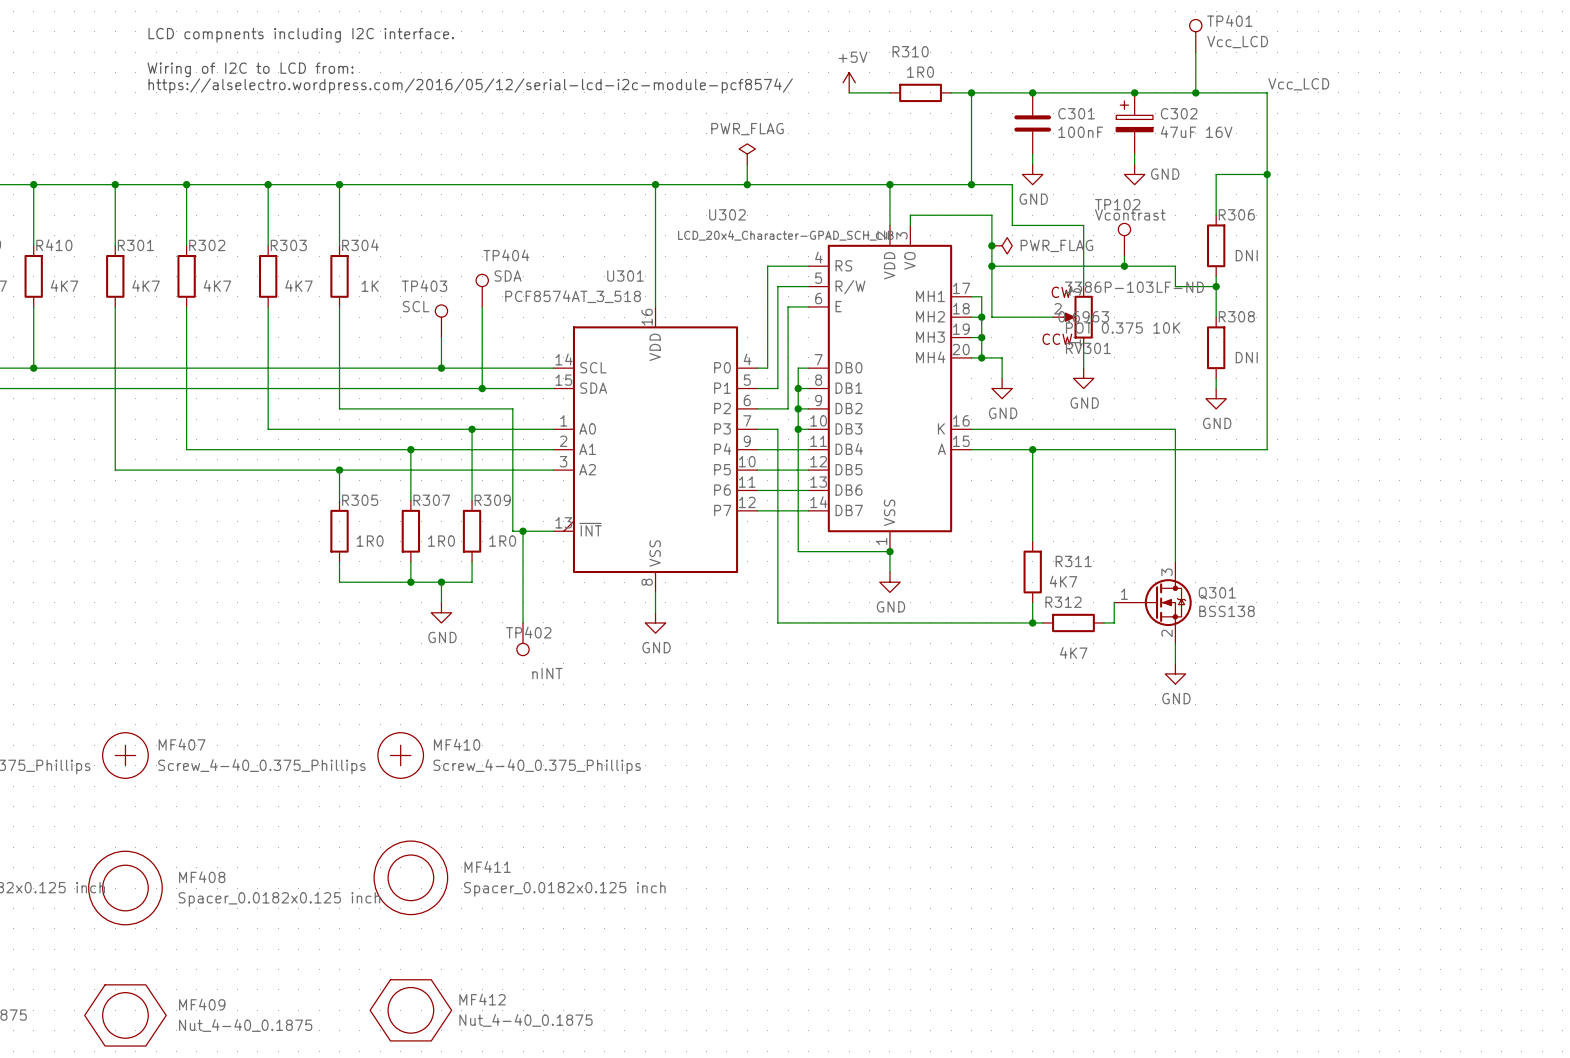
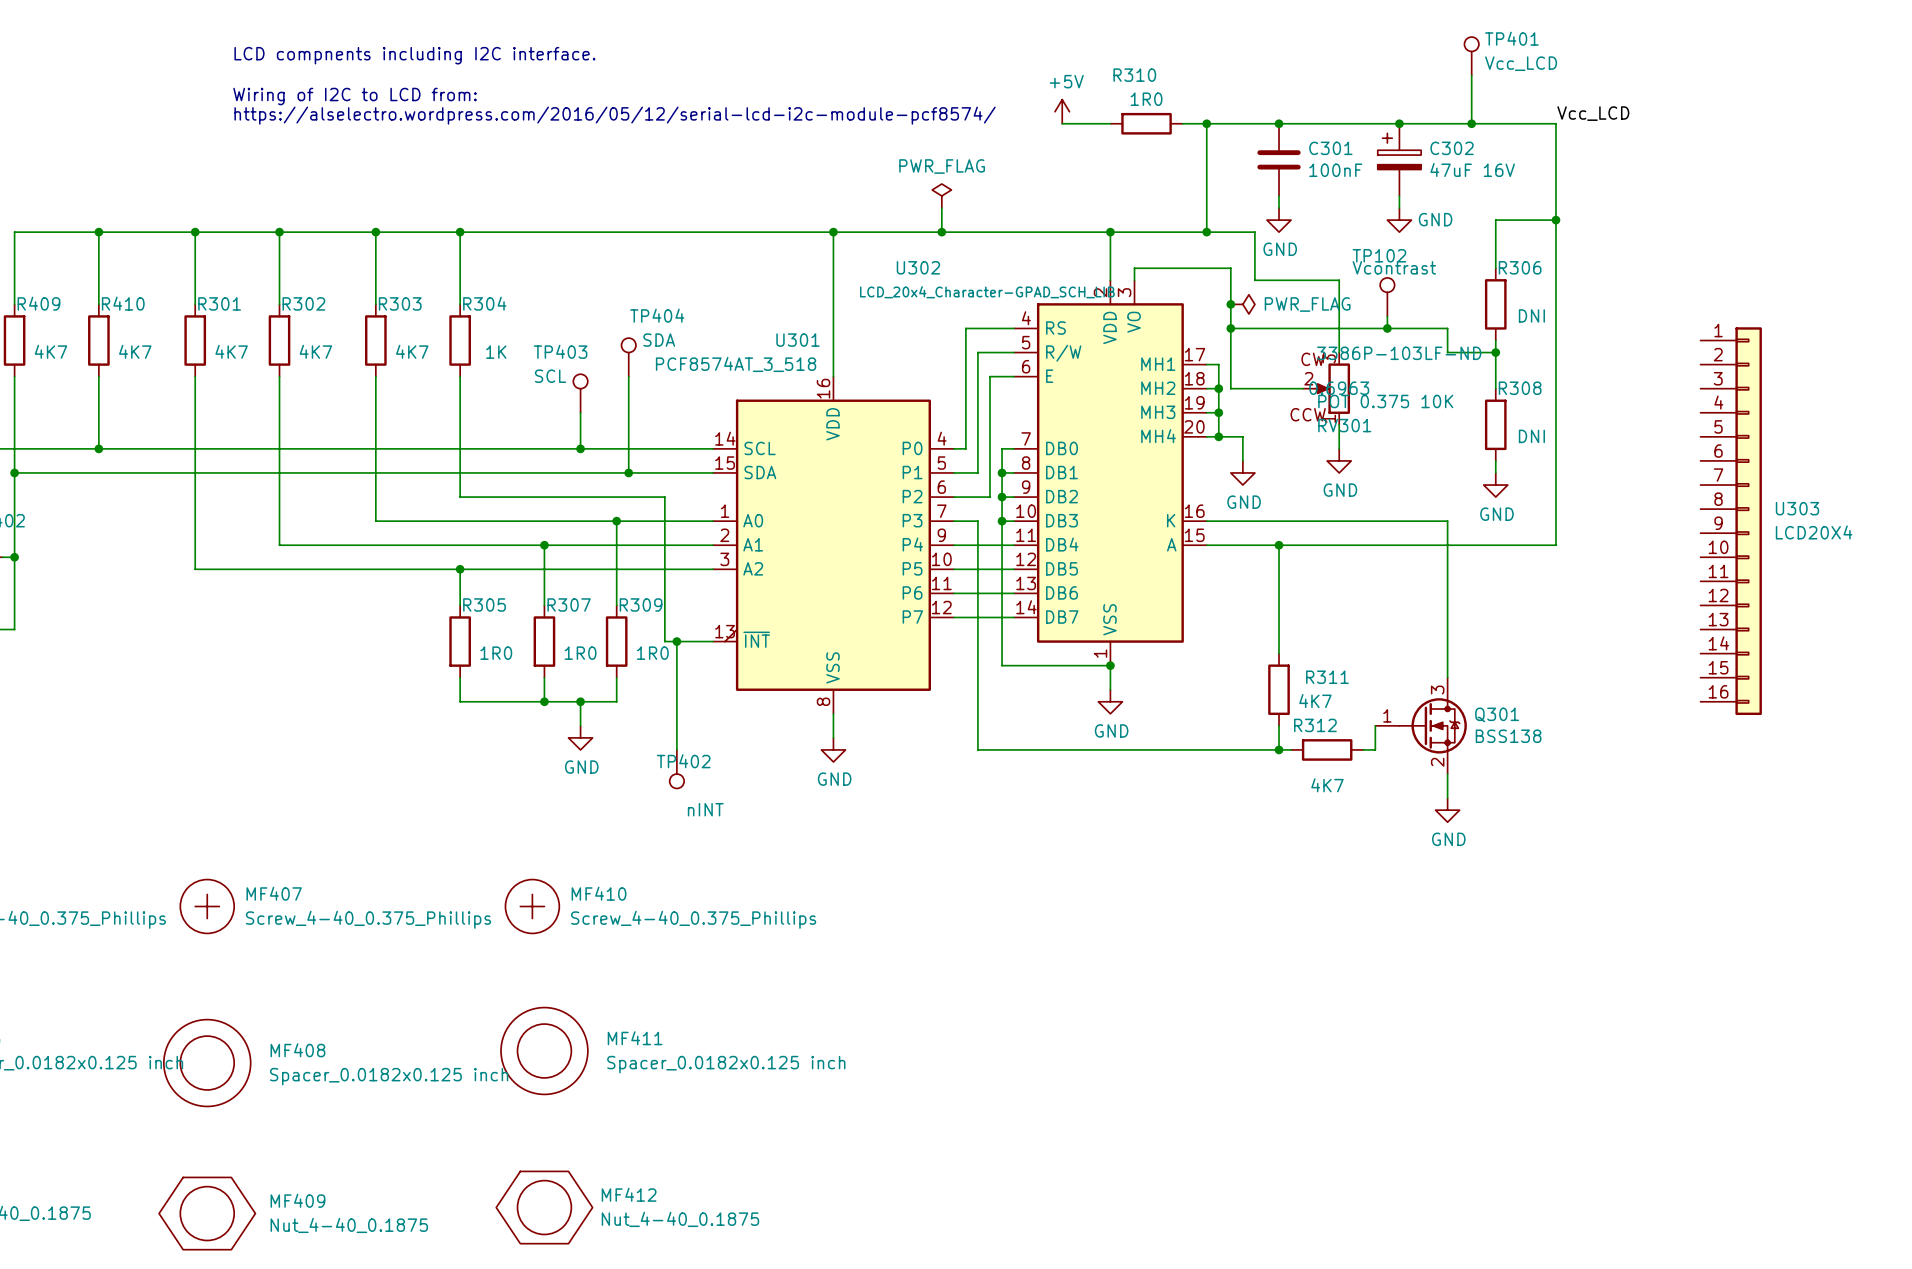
U303: none -> LCD20X4 (1731, 521)

